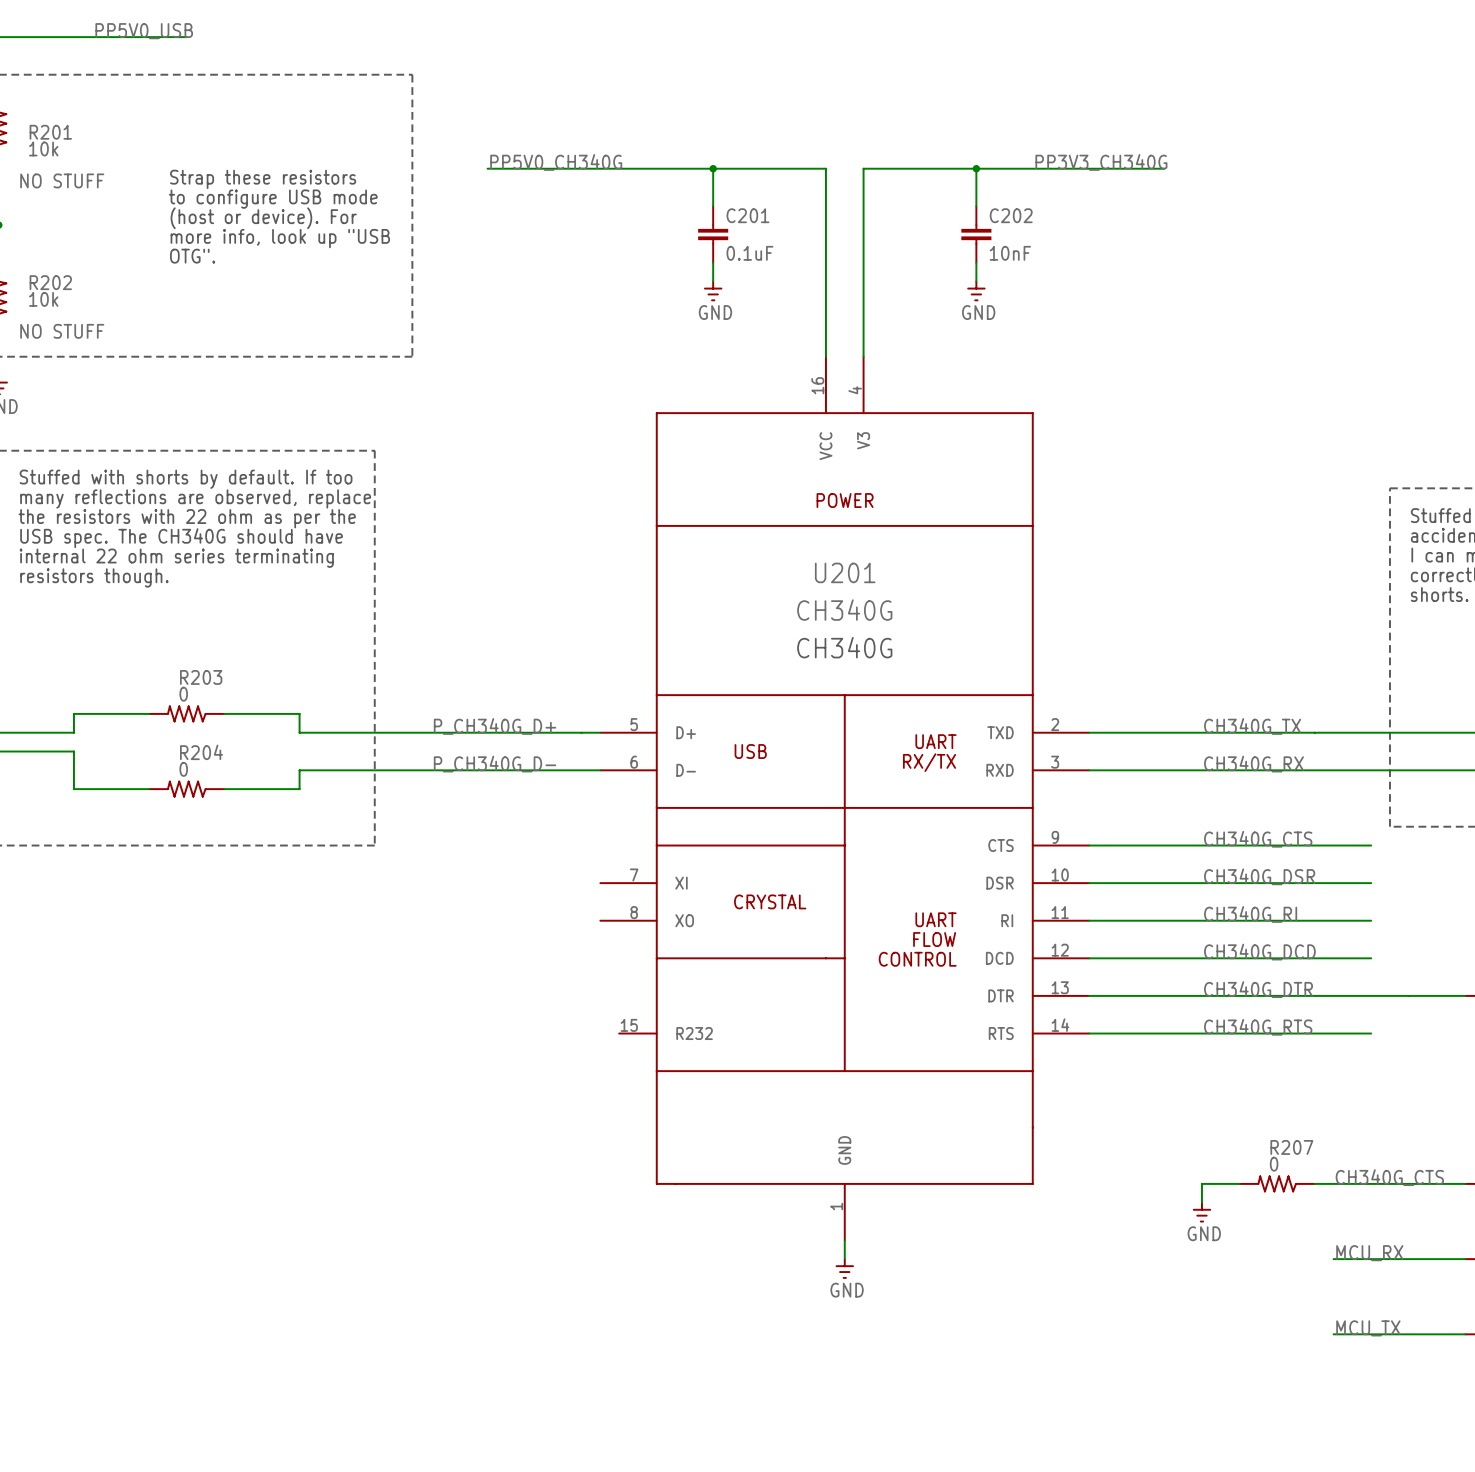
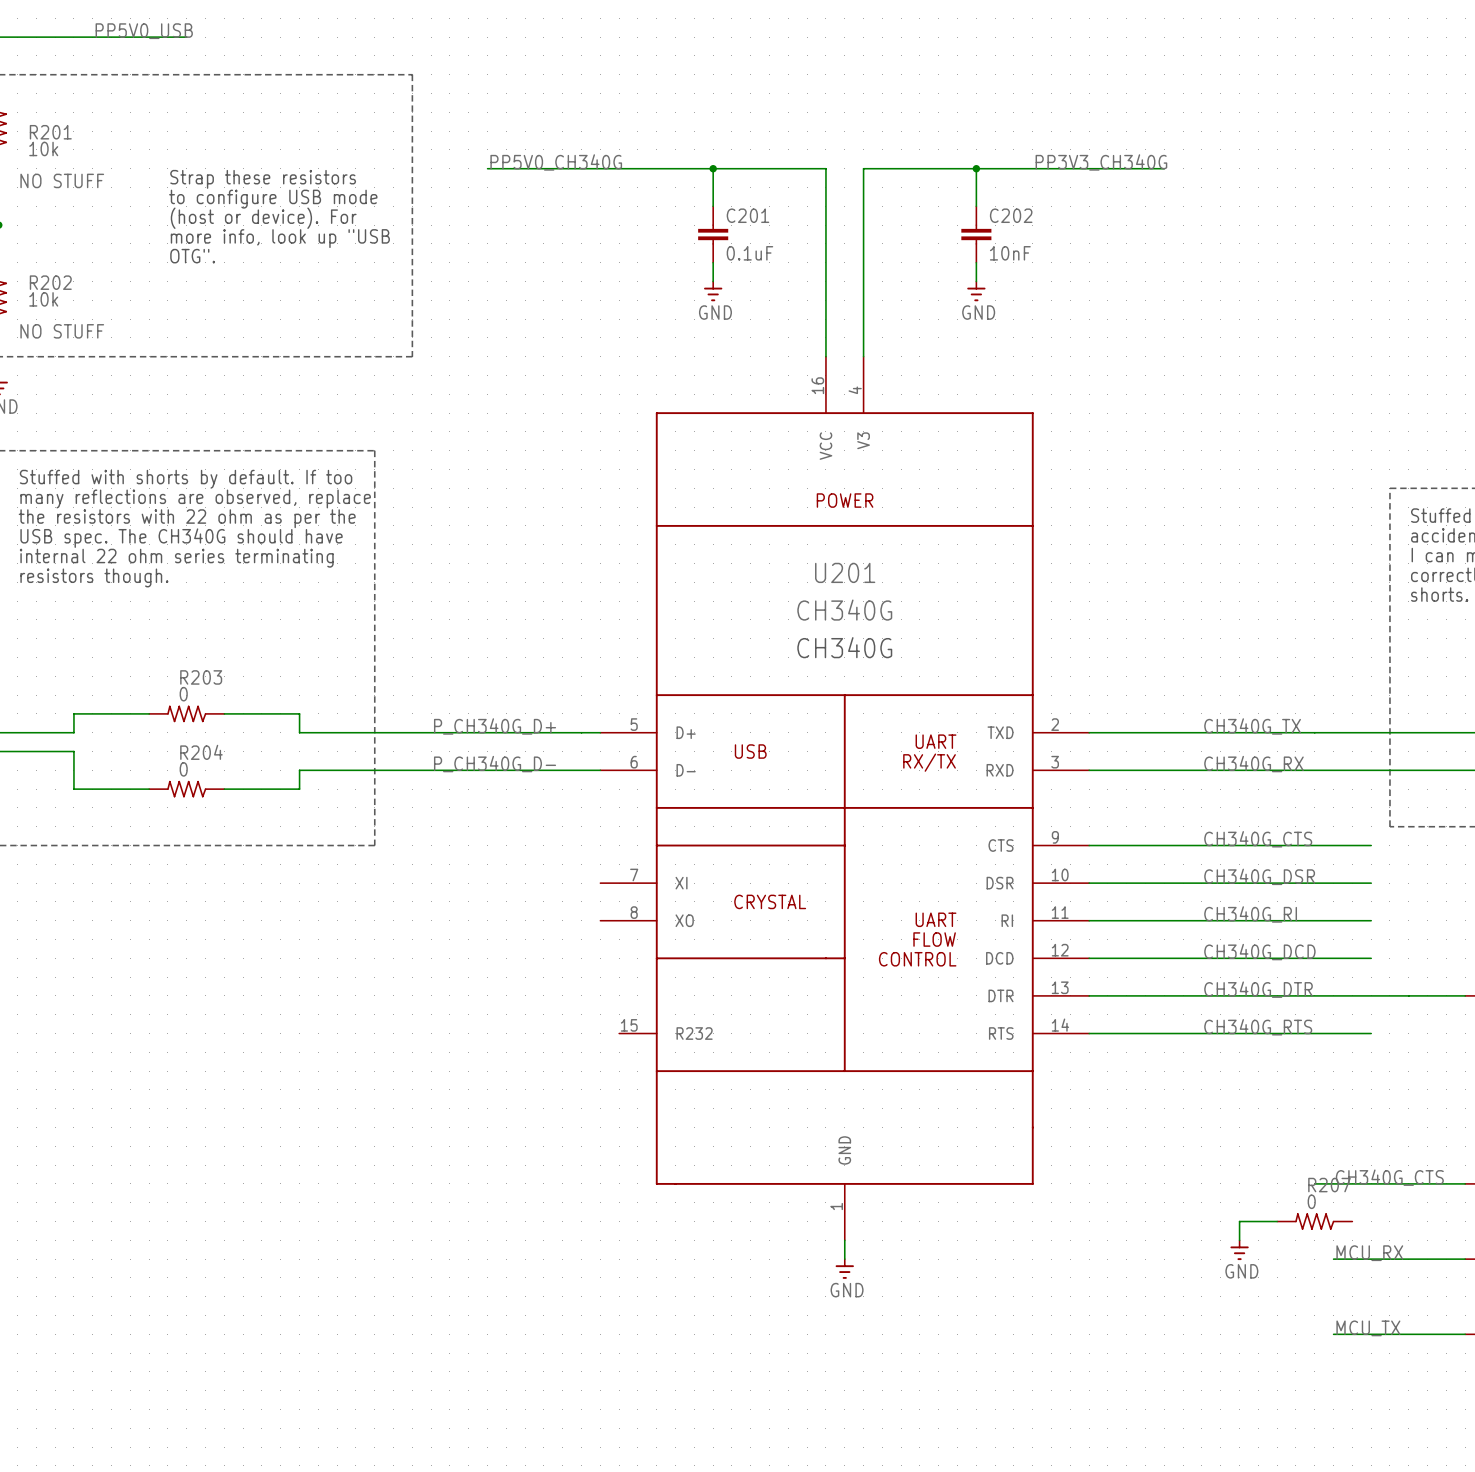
wire: (1239, 1183) (1201, 1183) (1201, 1202) -> (1277, 1221) (1239, 1221) (1239, 1240)
R207 position: (1277, 1183) -> (1314, 1221)
power symbol position: GND (1201, 1212) -> GND (1239, 1249)

